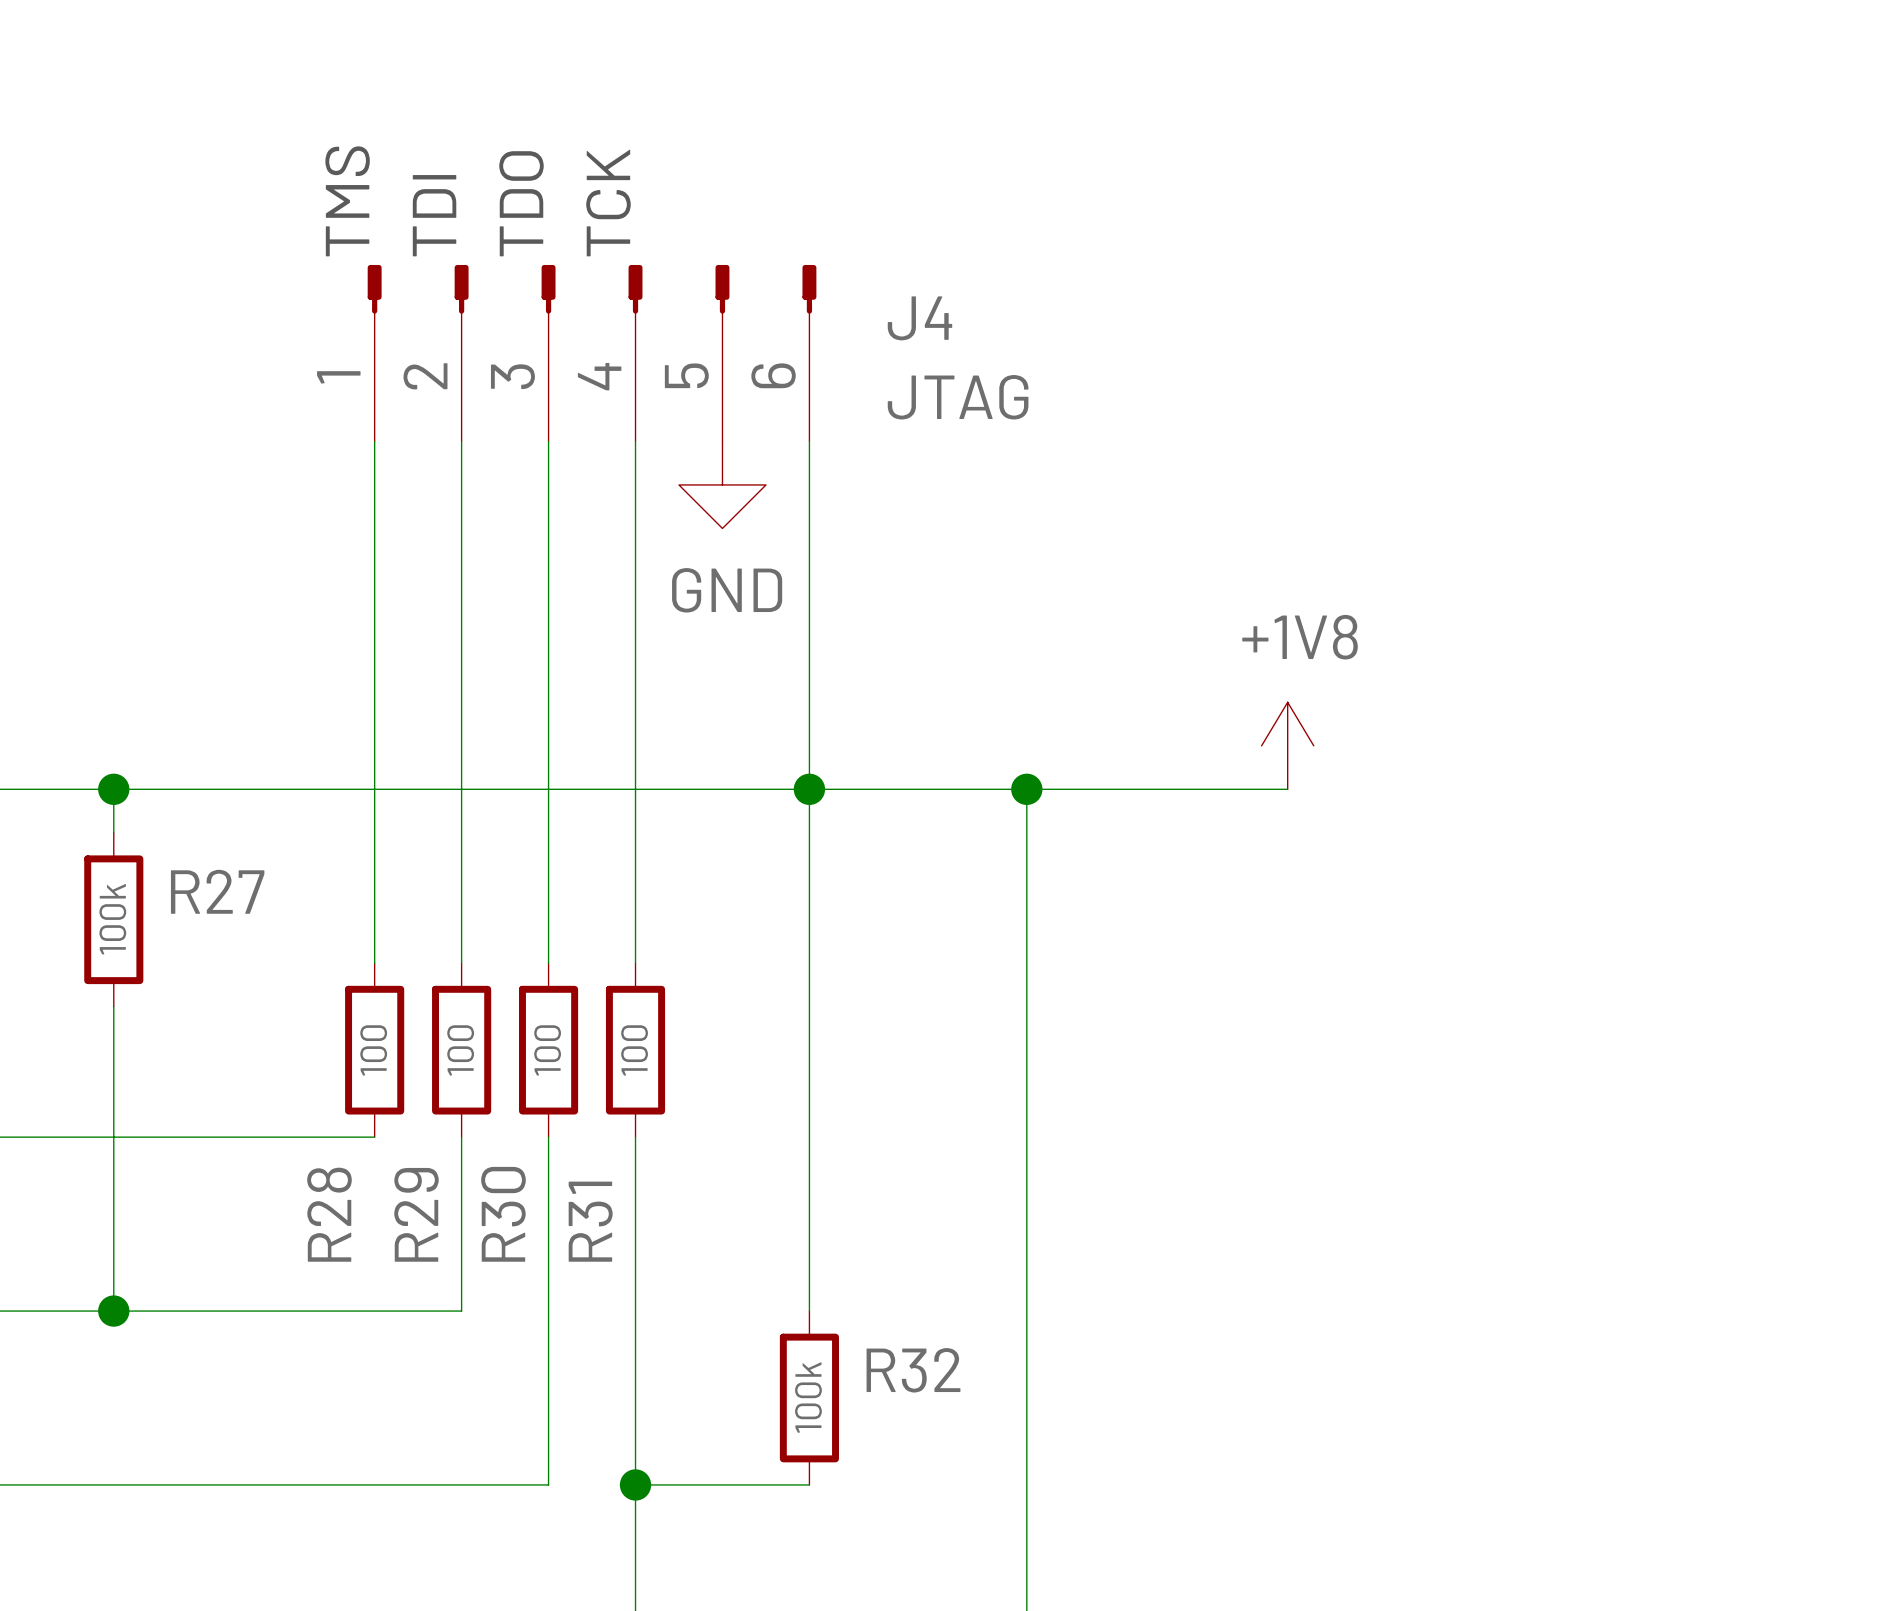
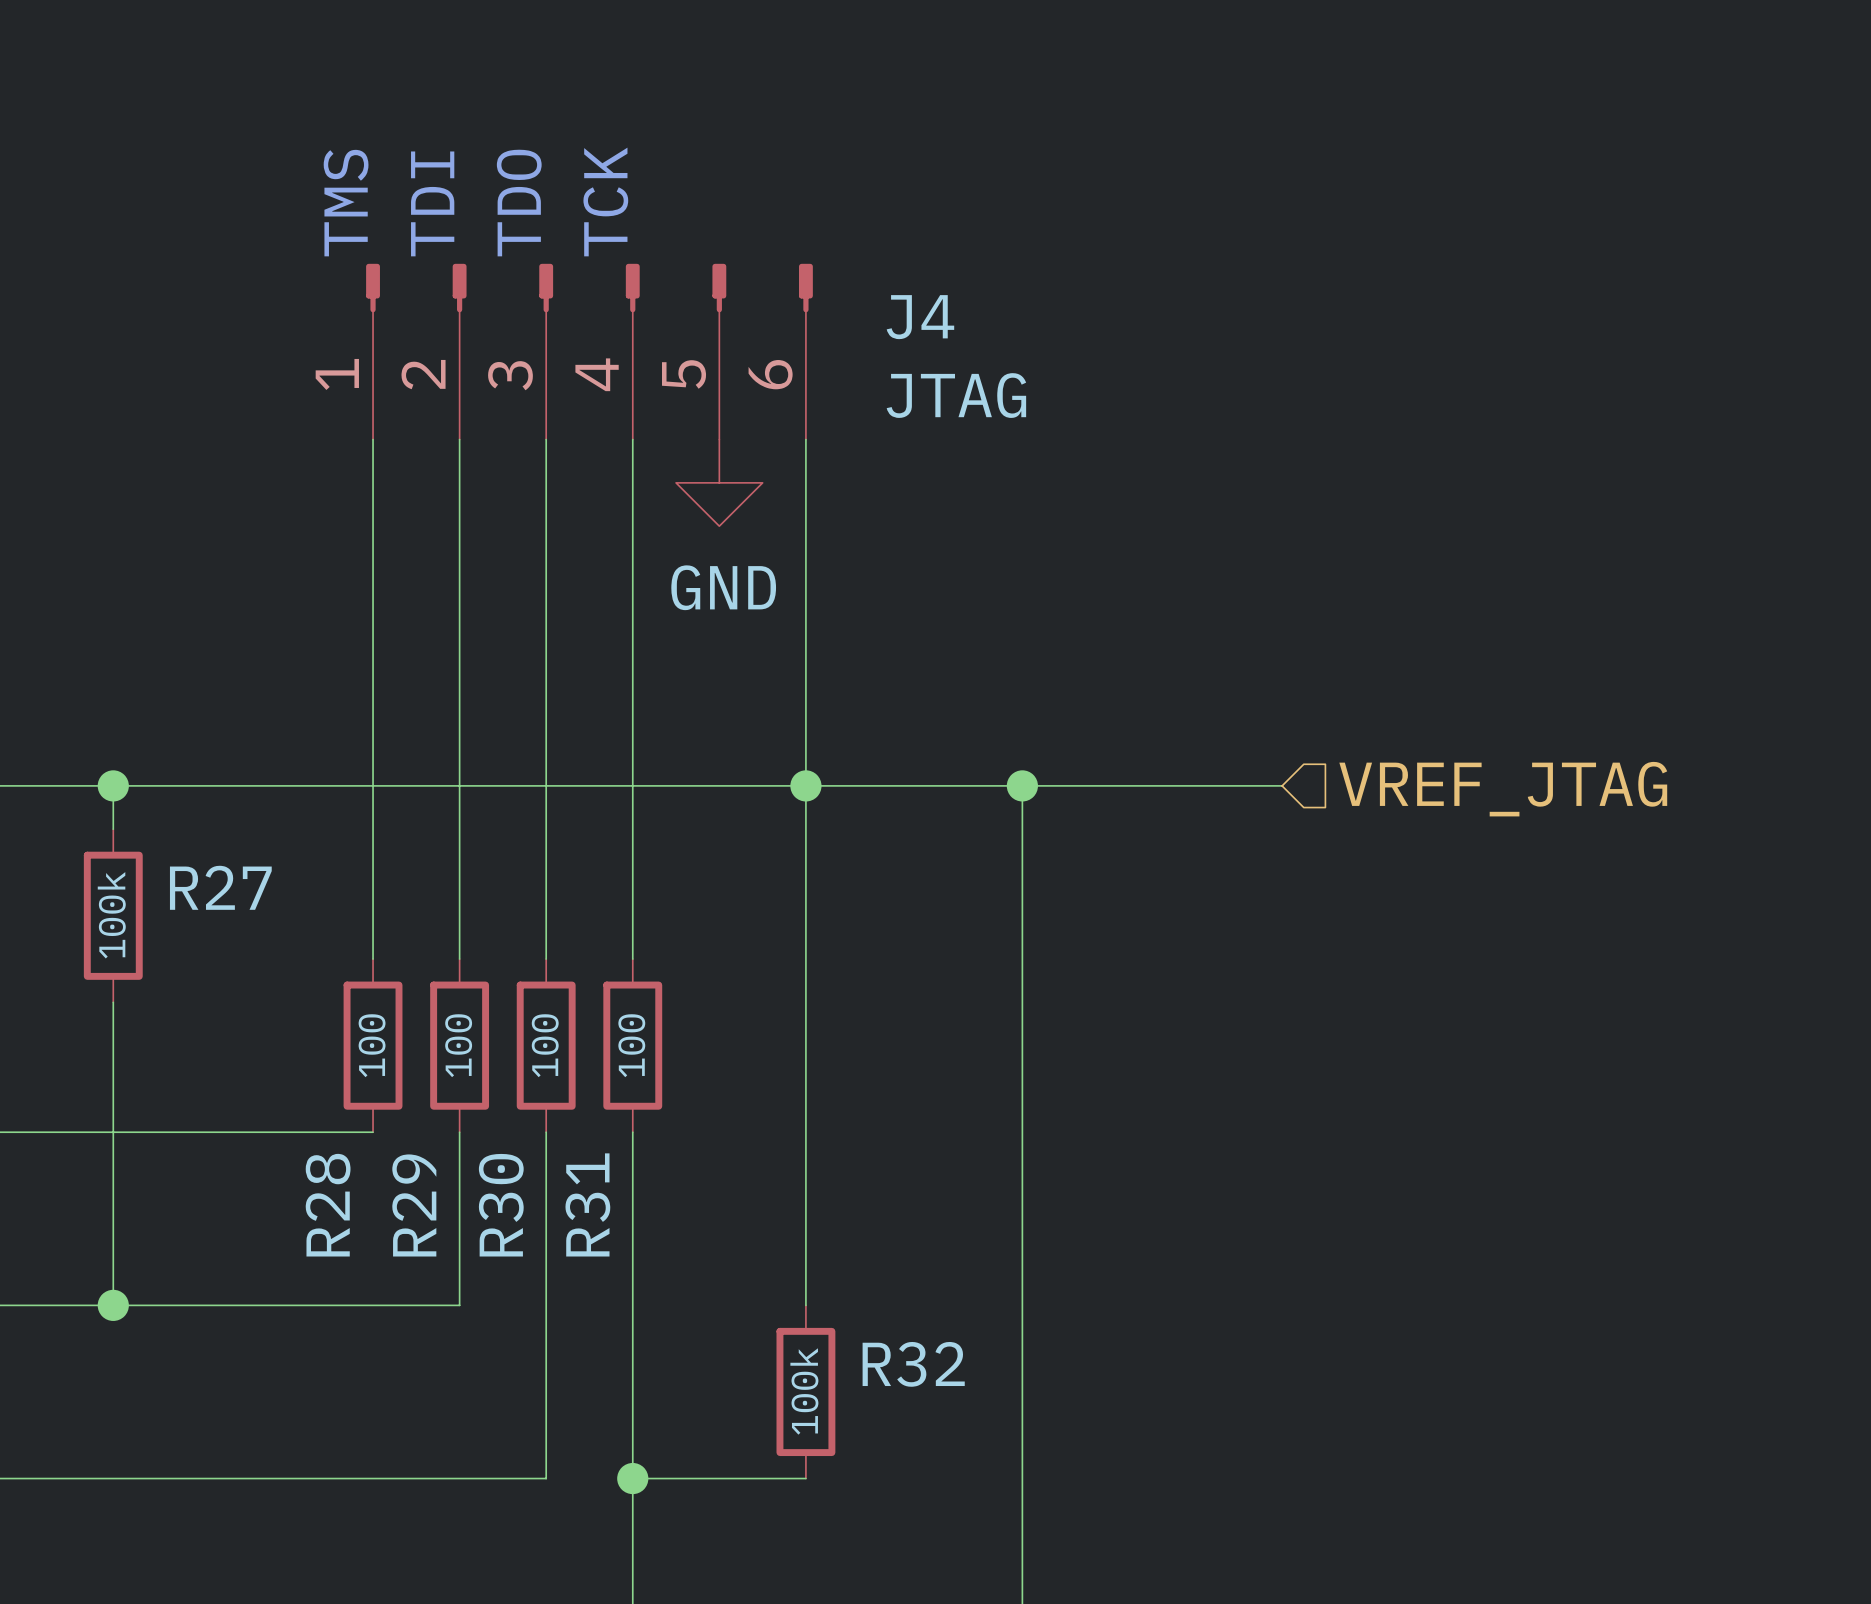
power symbol: +1V8 (1287, 745) -> none
hierarchical label: none -> VREF_JTAG (1503, 789)

